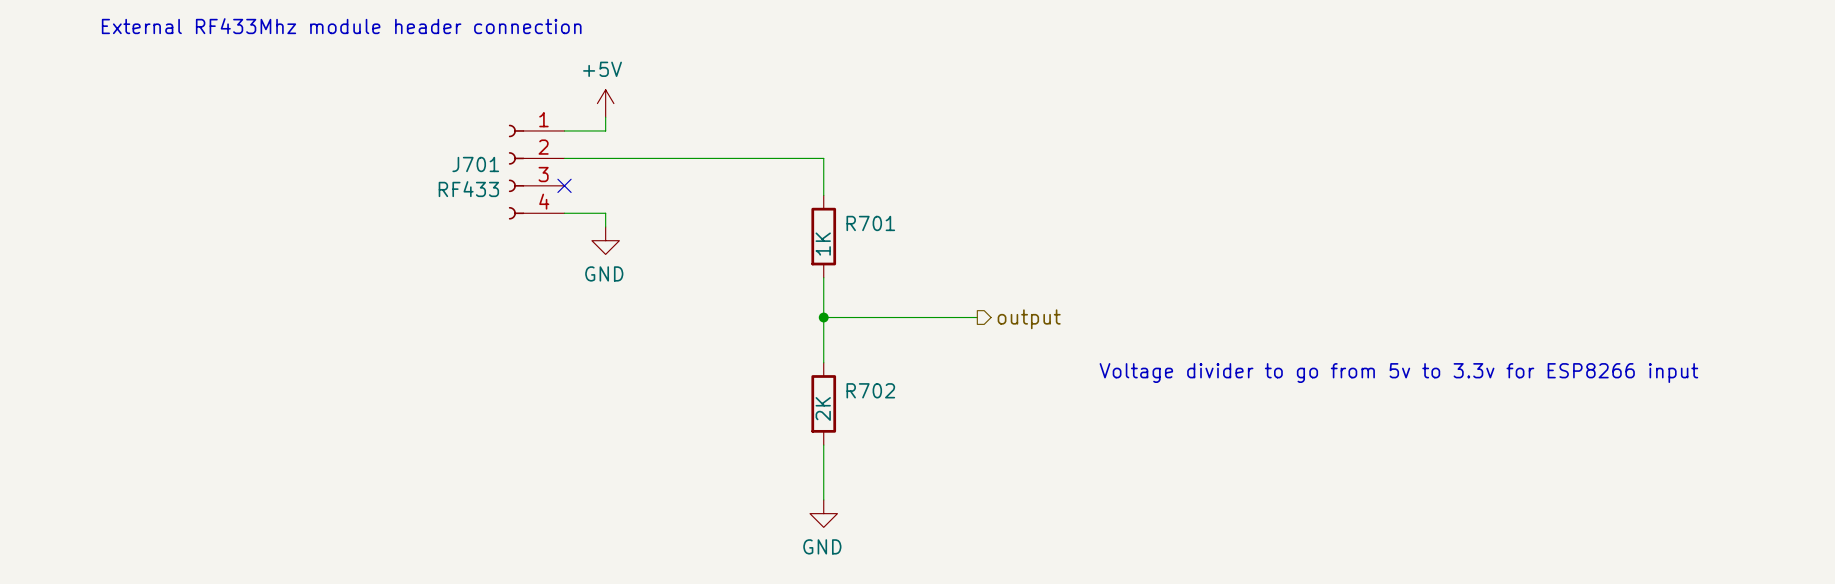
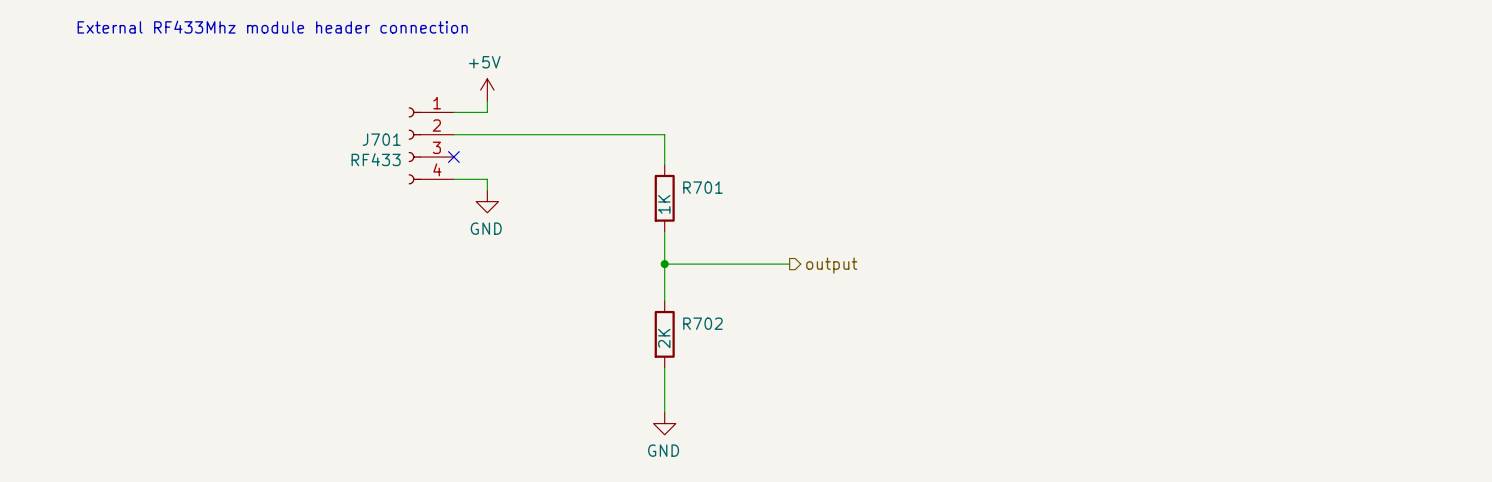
text: Voltage divider to go from 5v to 3.3v for ESP8266 input (1398, 373) -> none

